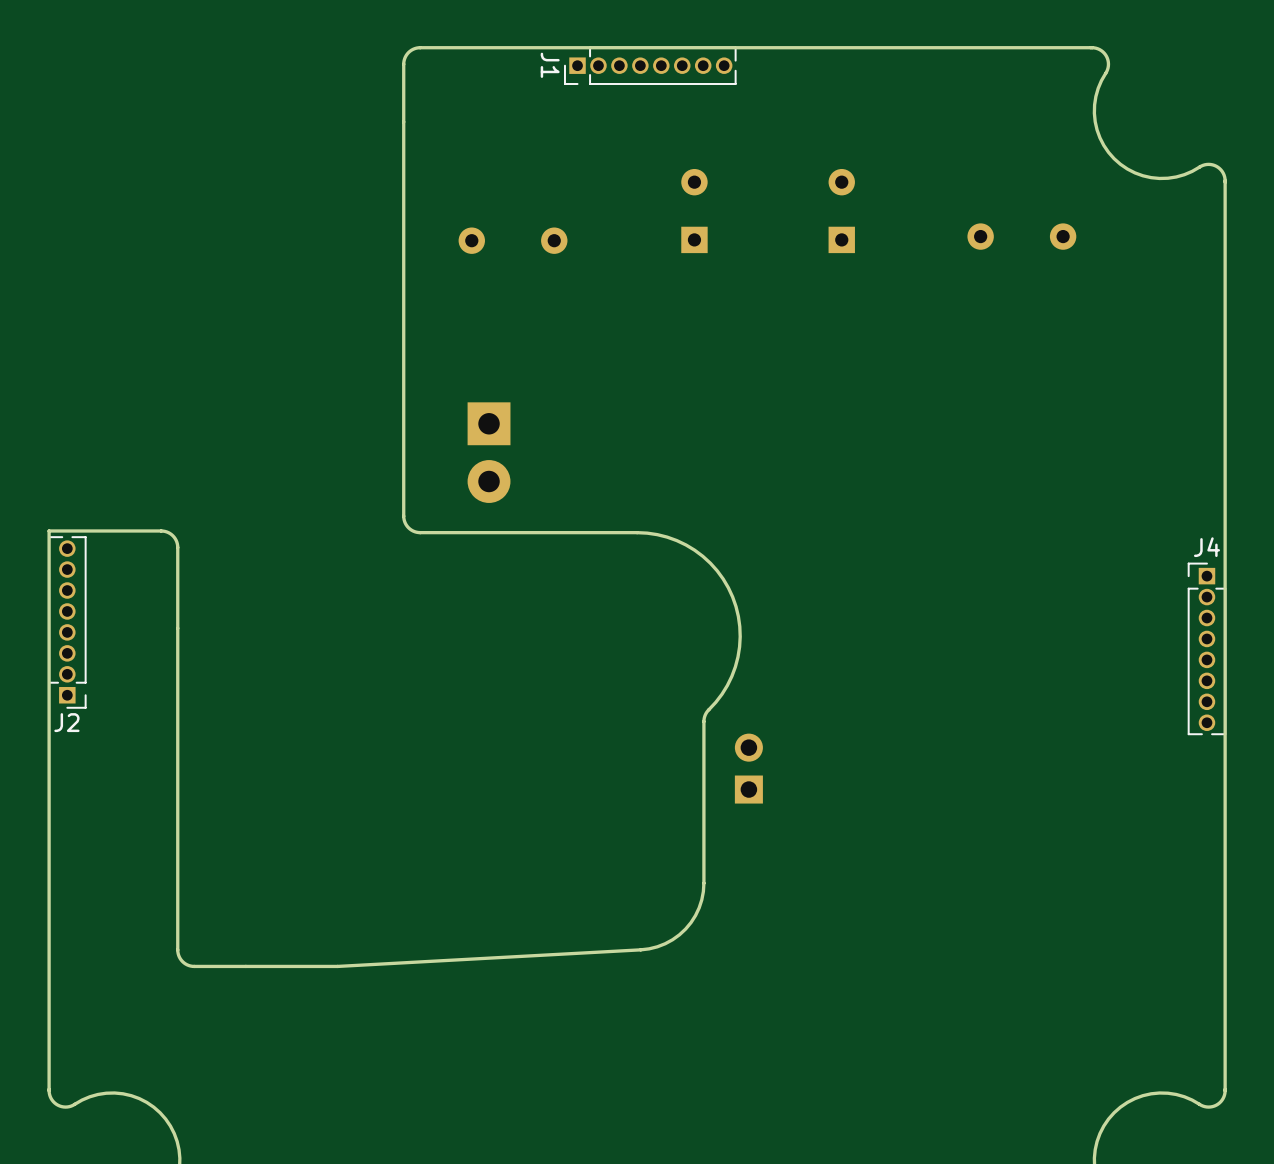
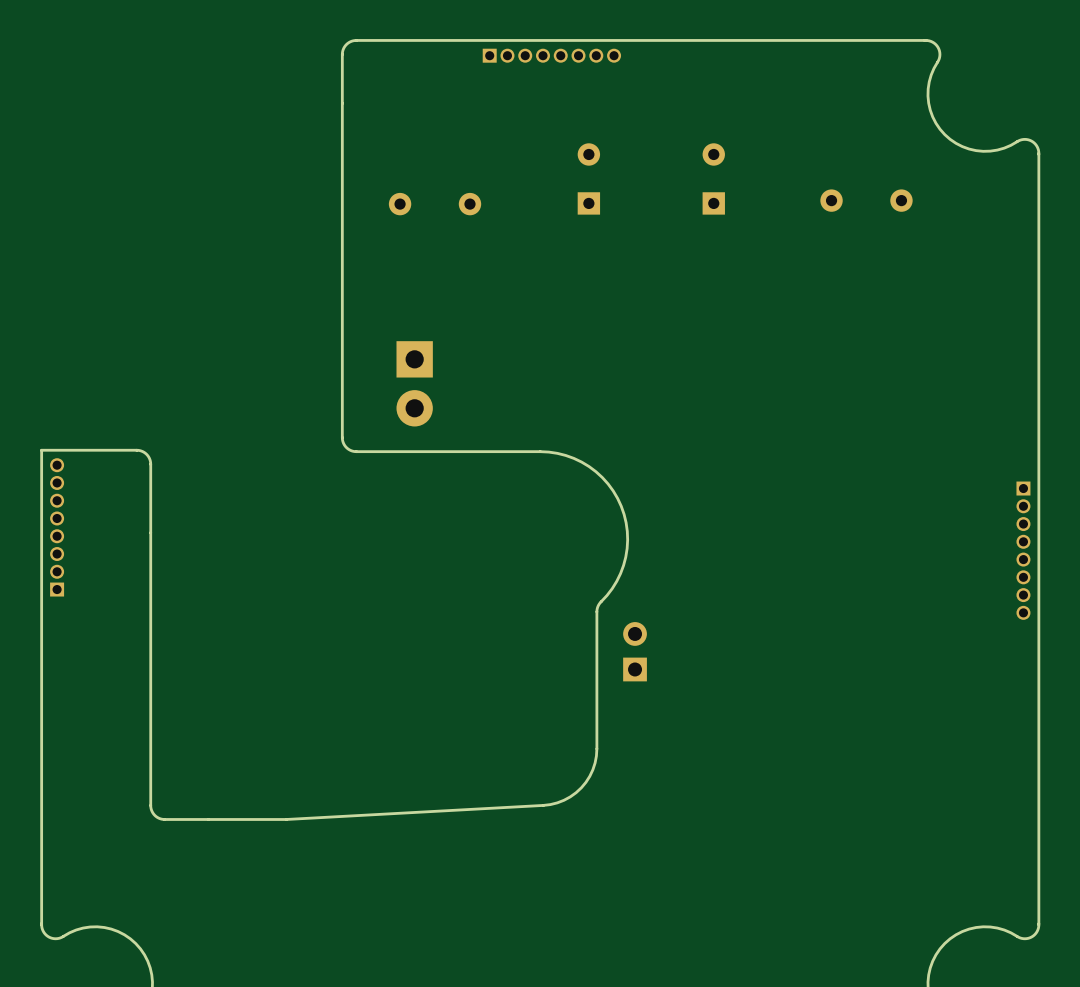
J1 side: bottom (650, 65) -> top (551, 55)
J2 side: bottom (67, 622) -> top (57, 527)
J4 side: bottom (1206, 648) -> top (1023, 550)

